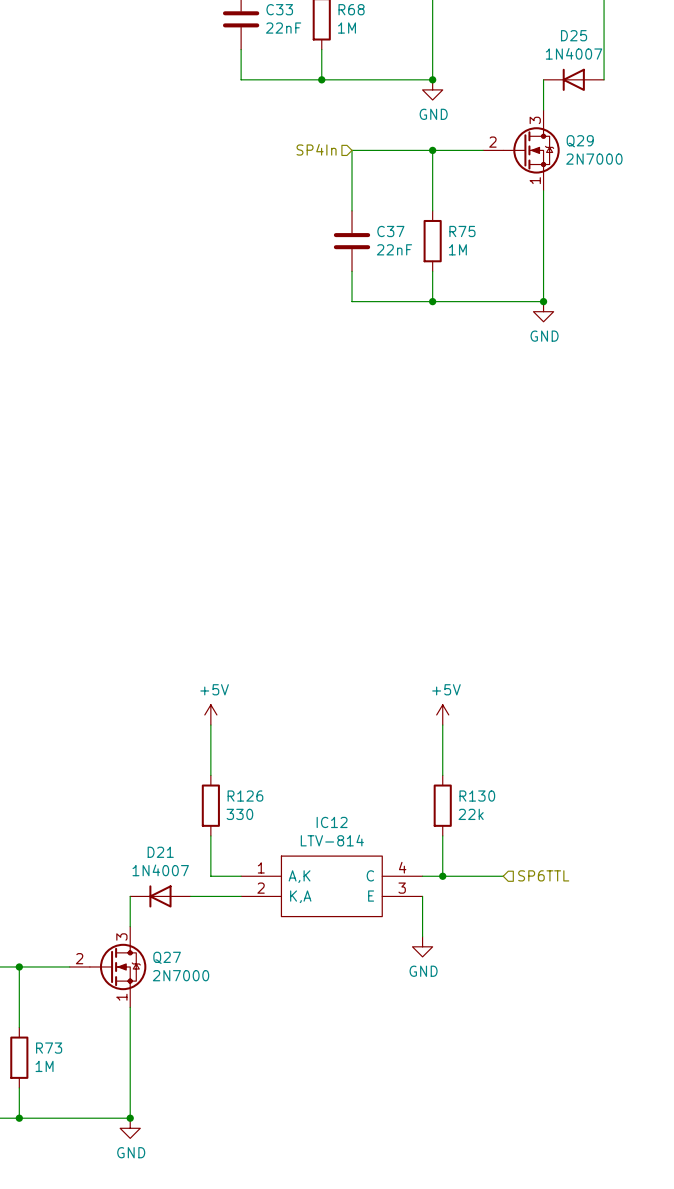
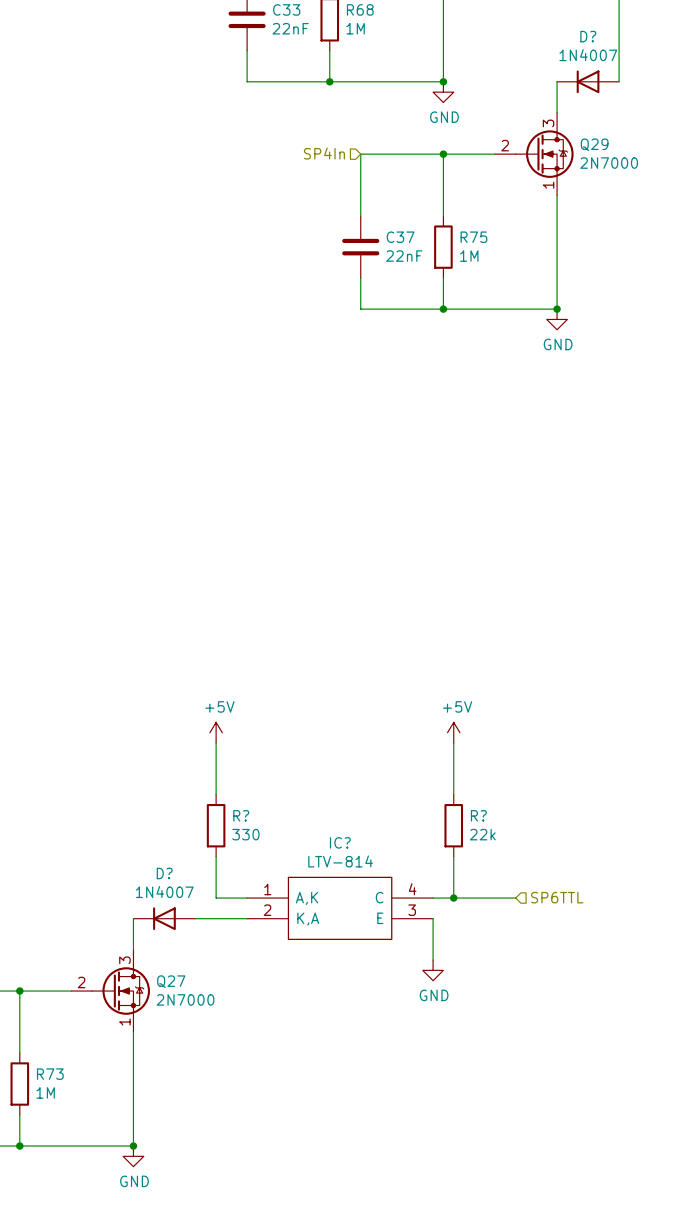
D25 name: D25 (574, 35) -> D? (588, 36)
R126 name: R126 (245, 796) -> R? (241, 815)
R130 name: R130 (477, 796) -> R? (478, 815)
IC12 name: IC12 (332, 822) -> IC? (340, 842)
D21 name: D21 (160, 852) -> D? (164, 873)

